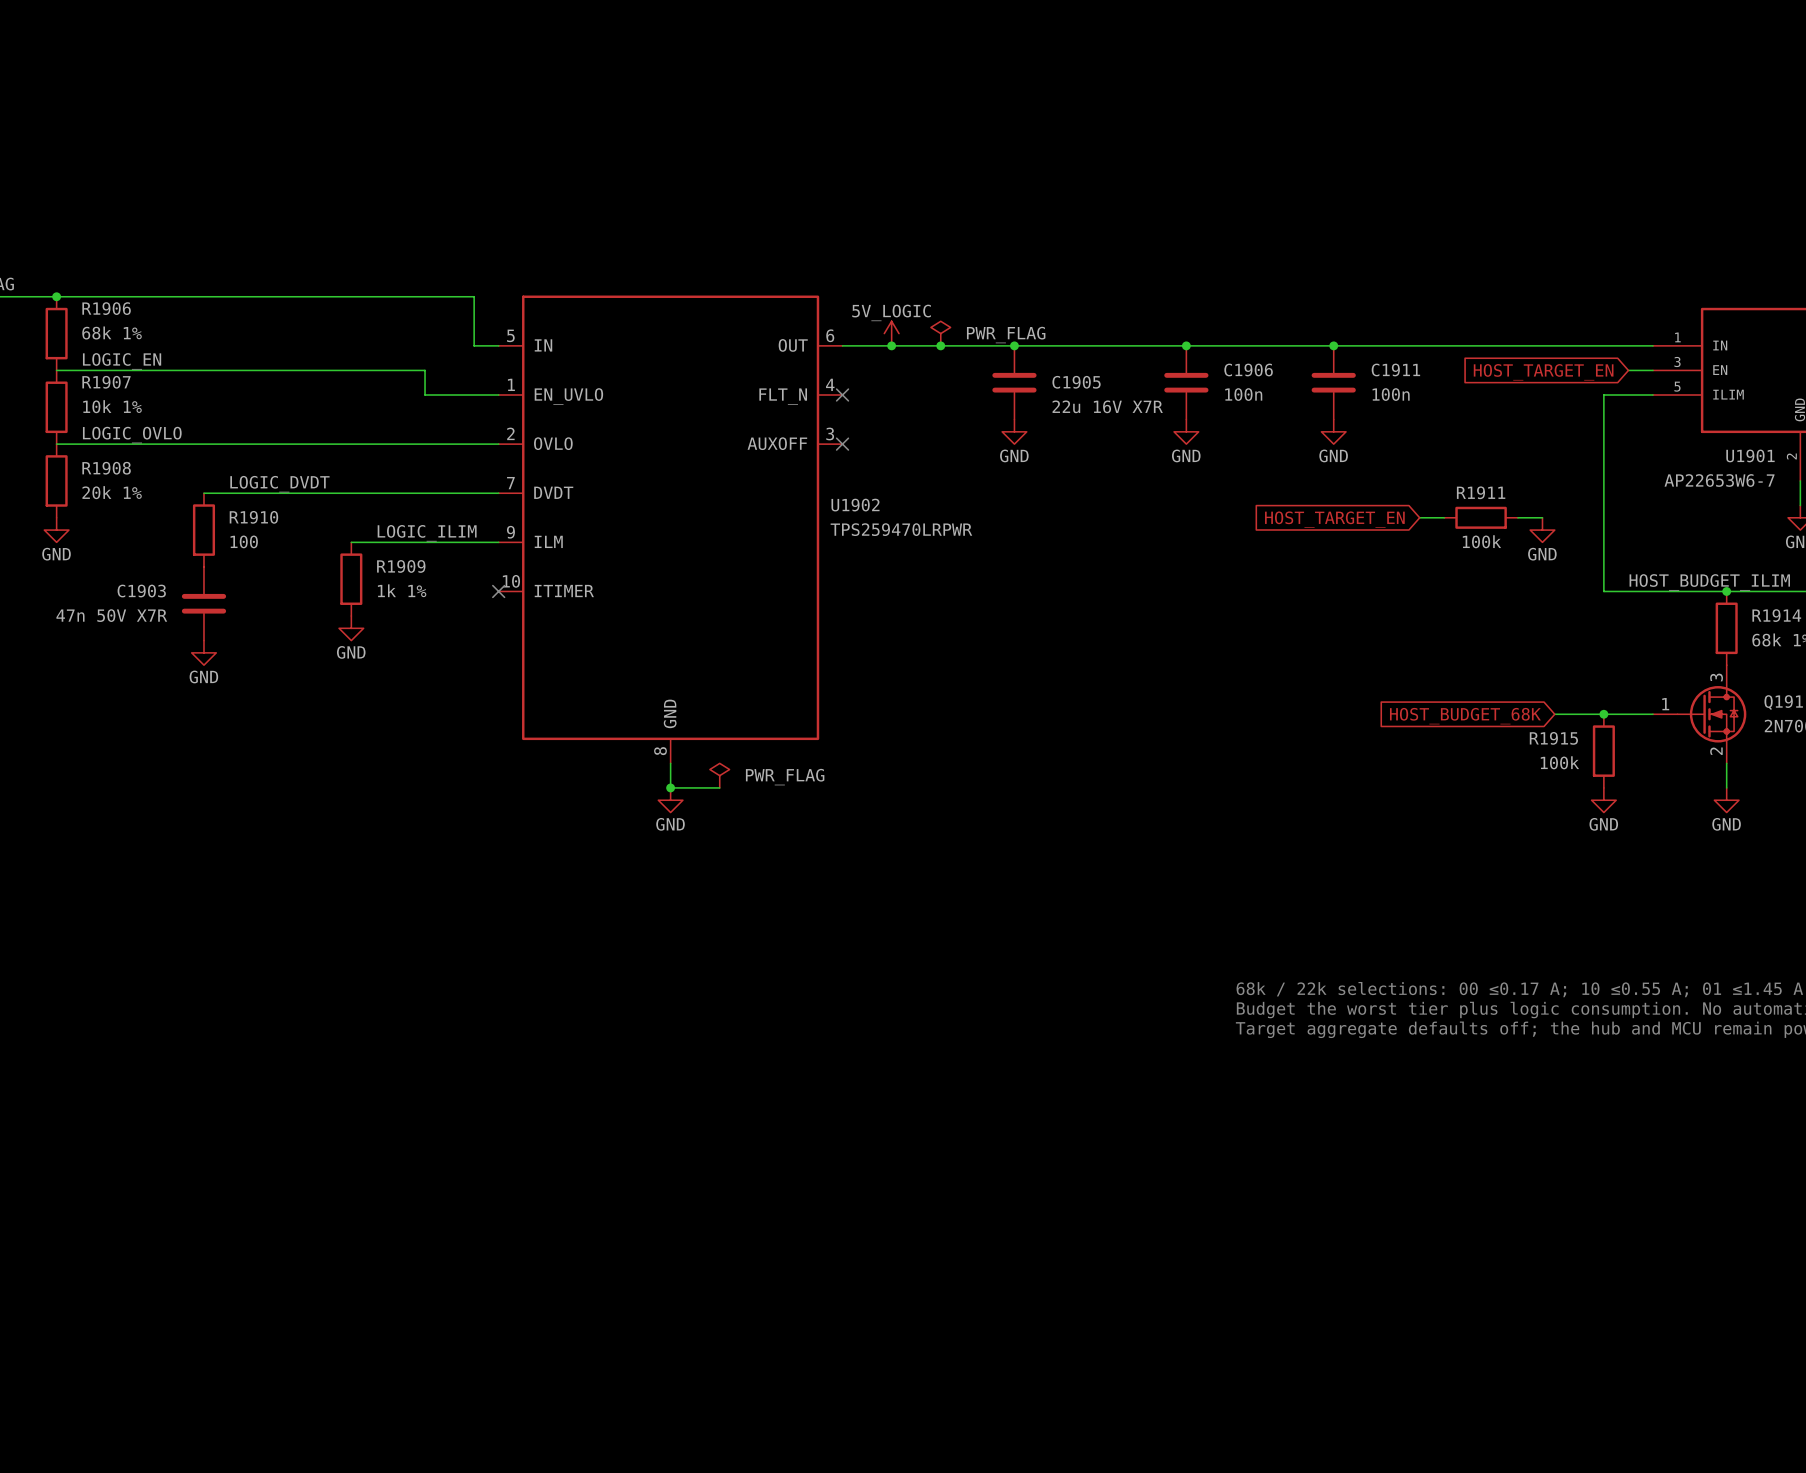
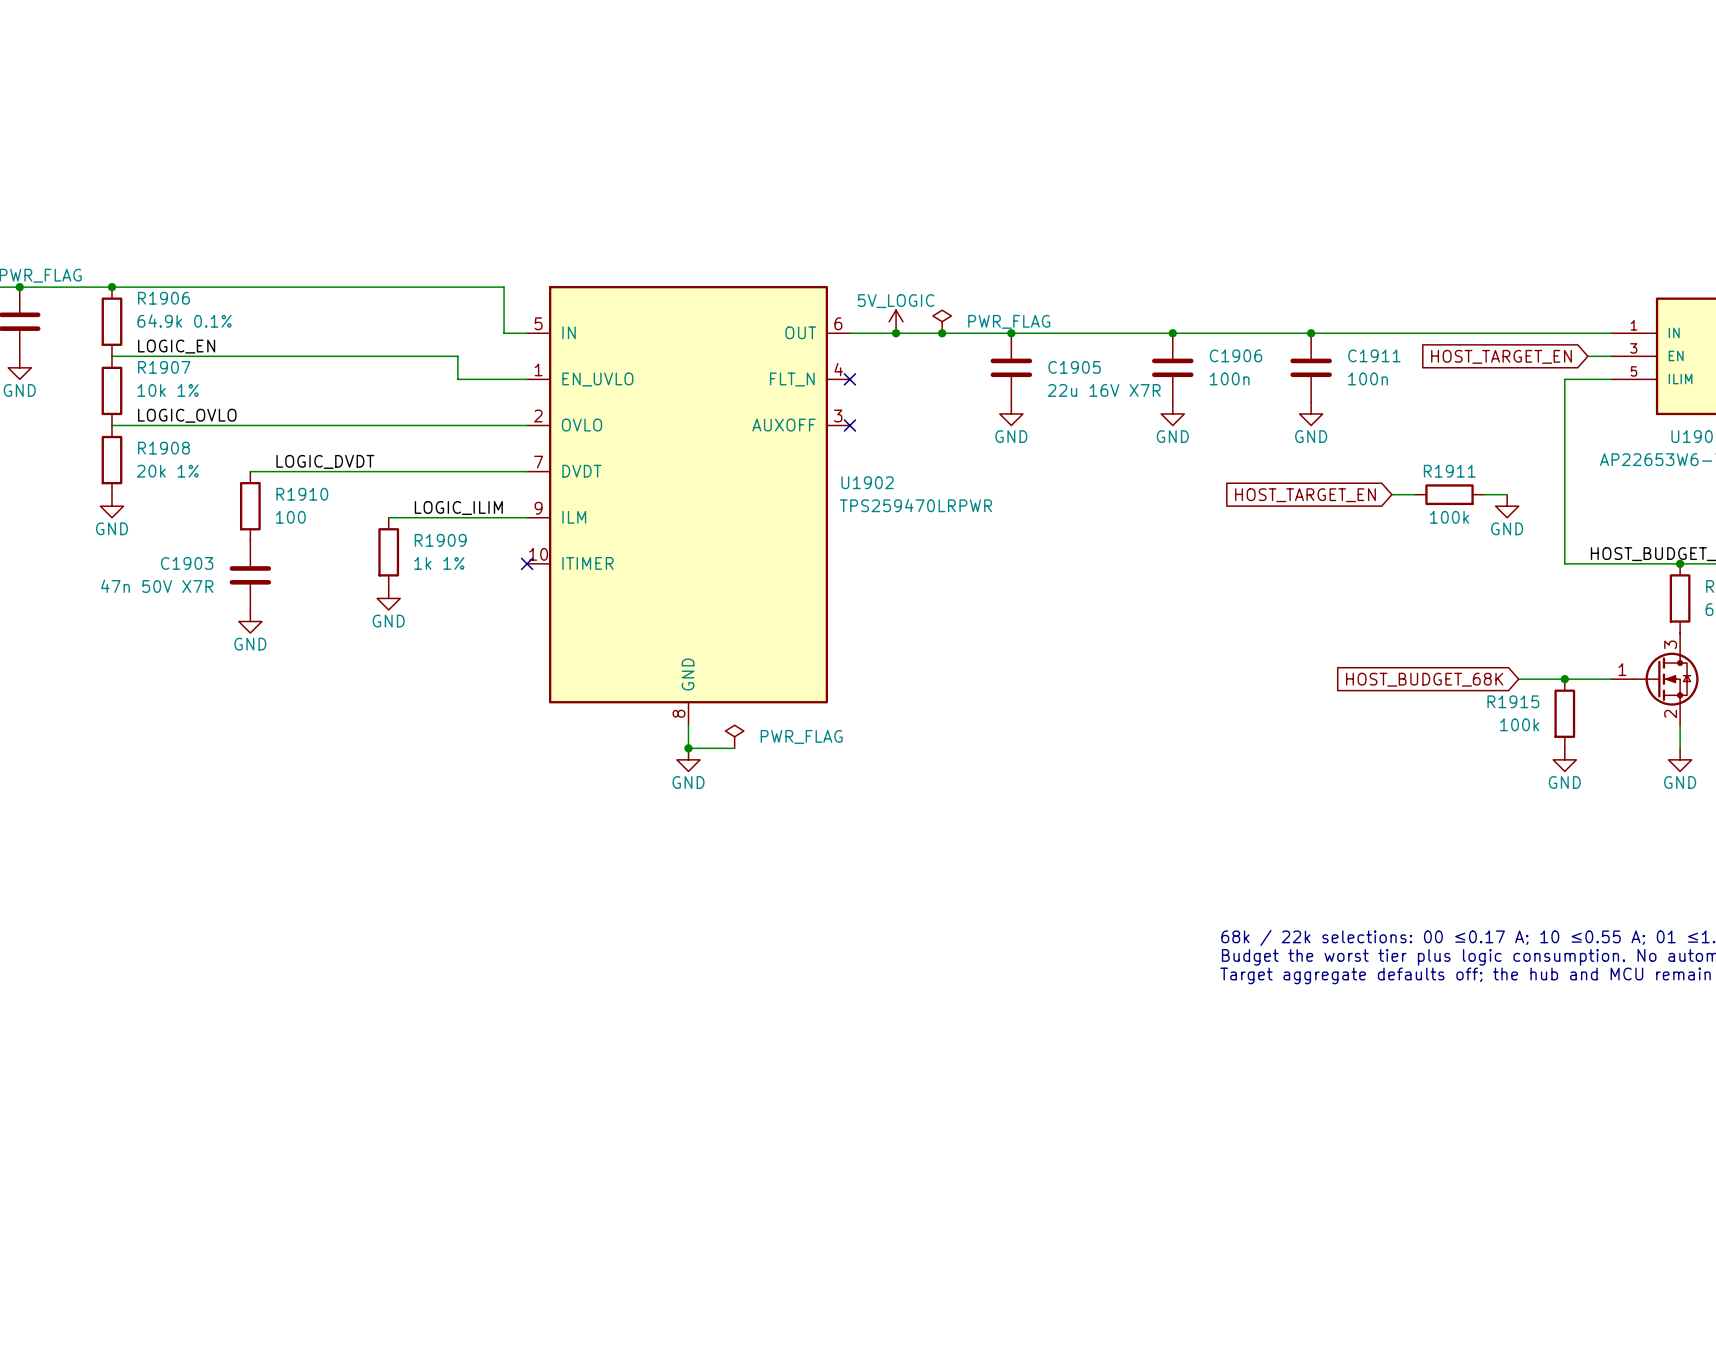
R1906 value: 68k 1% (112, 333) -> 64.9k 0.1% (184, 321)

